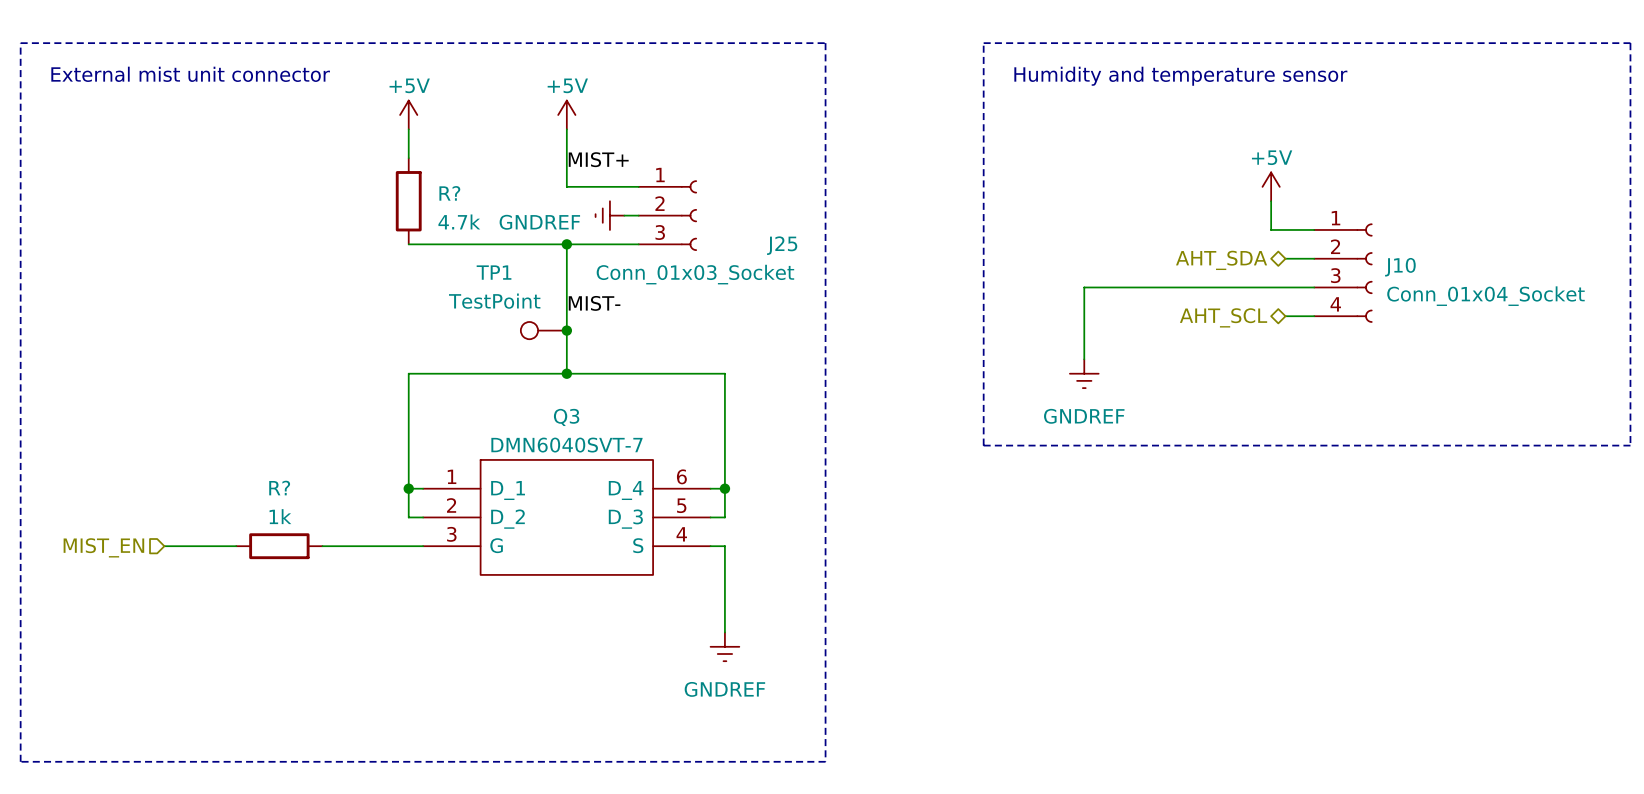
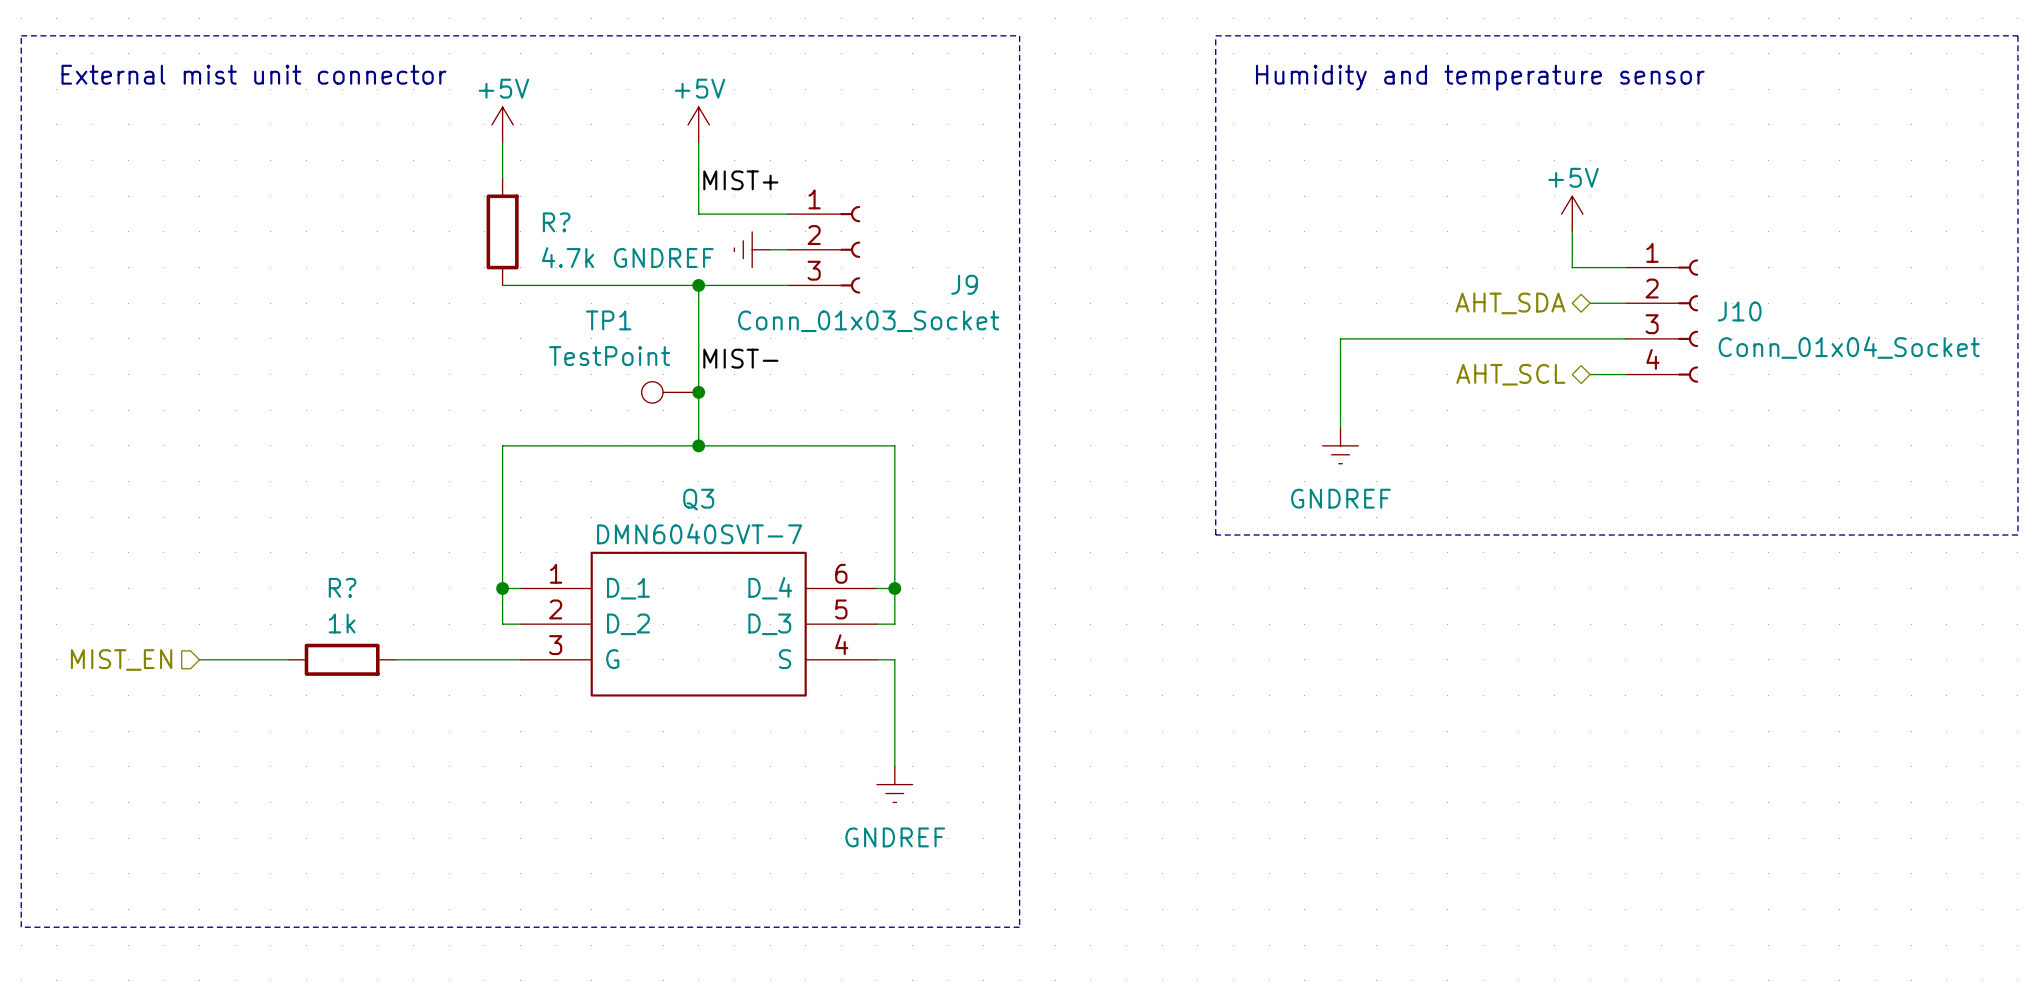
J25 name: J25 (782, 245) -> J9 (964, 284)

